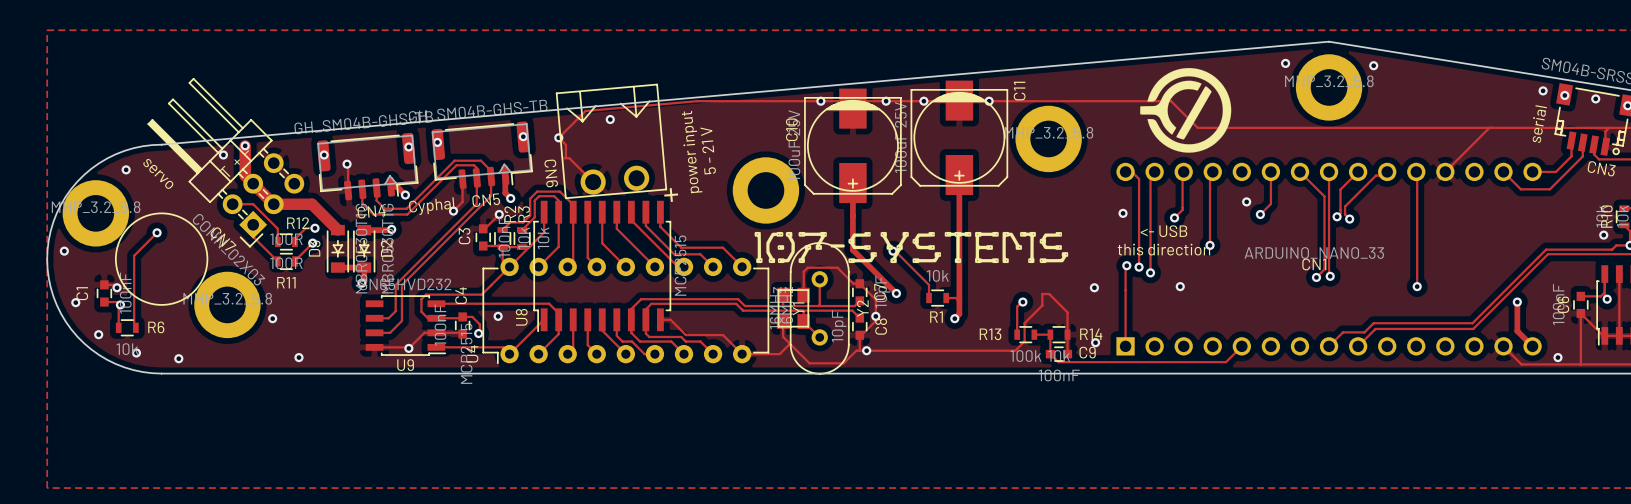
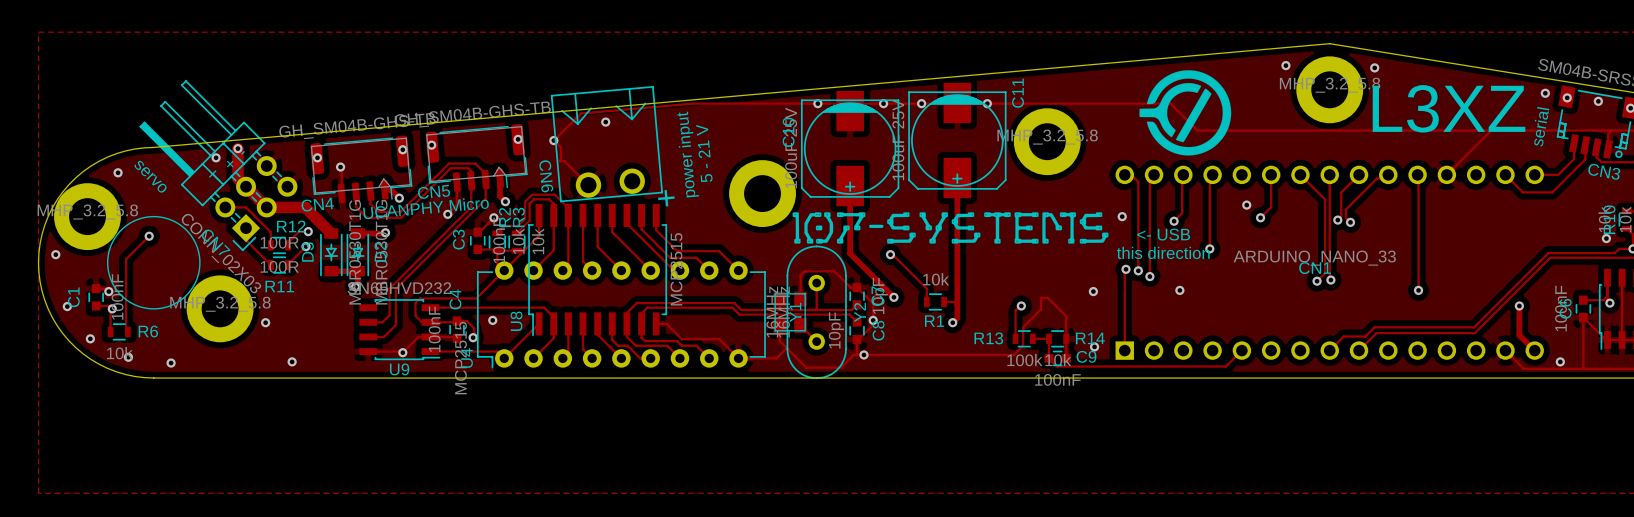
text: none -> L3XZ (1449, 108)
CN5 name position: CN5 (486, 200) -> CN5 (434, 191)
text: Cyphal (431, 206) -> UCANPHY Micro (426, 208)
CN4 name position: CN4 (371, 211) -> CN4 (317, 204)
drawing position: (911, 247) -> (950, 227)

